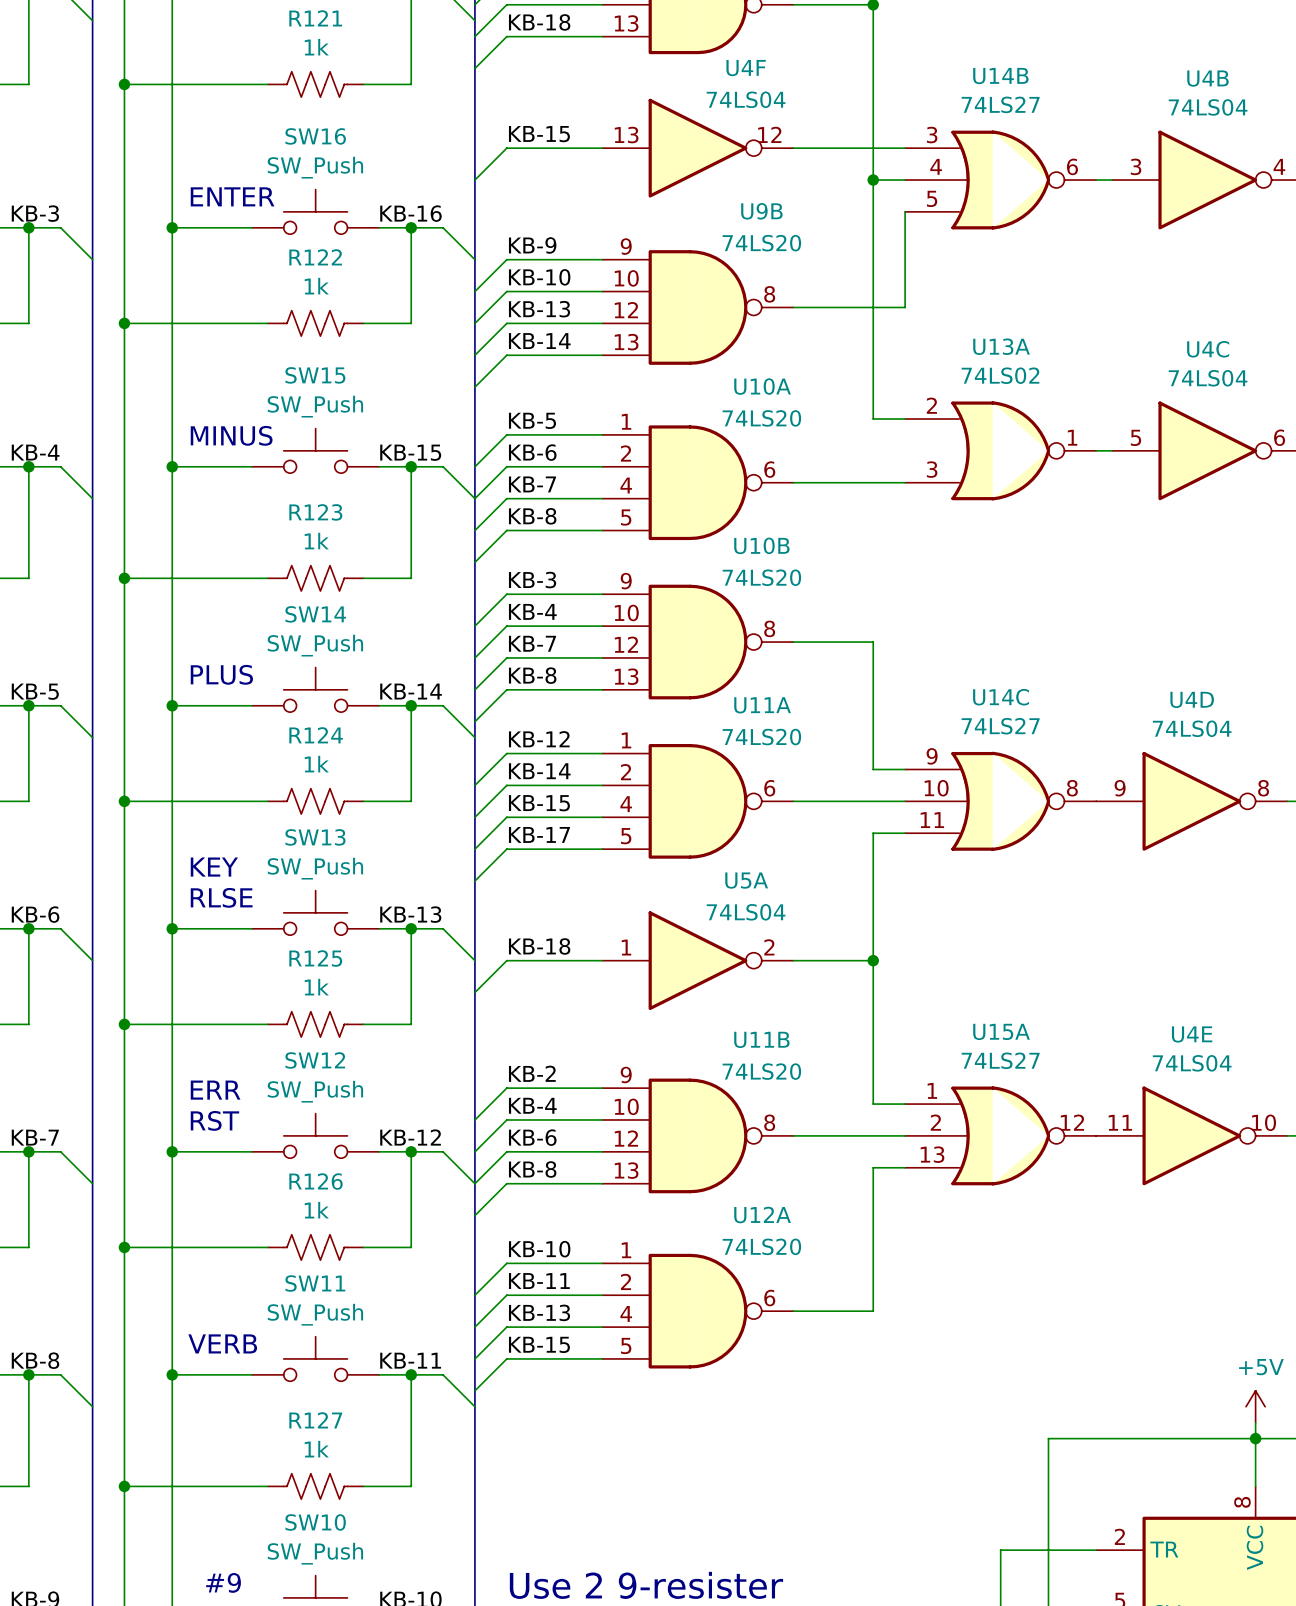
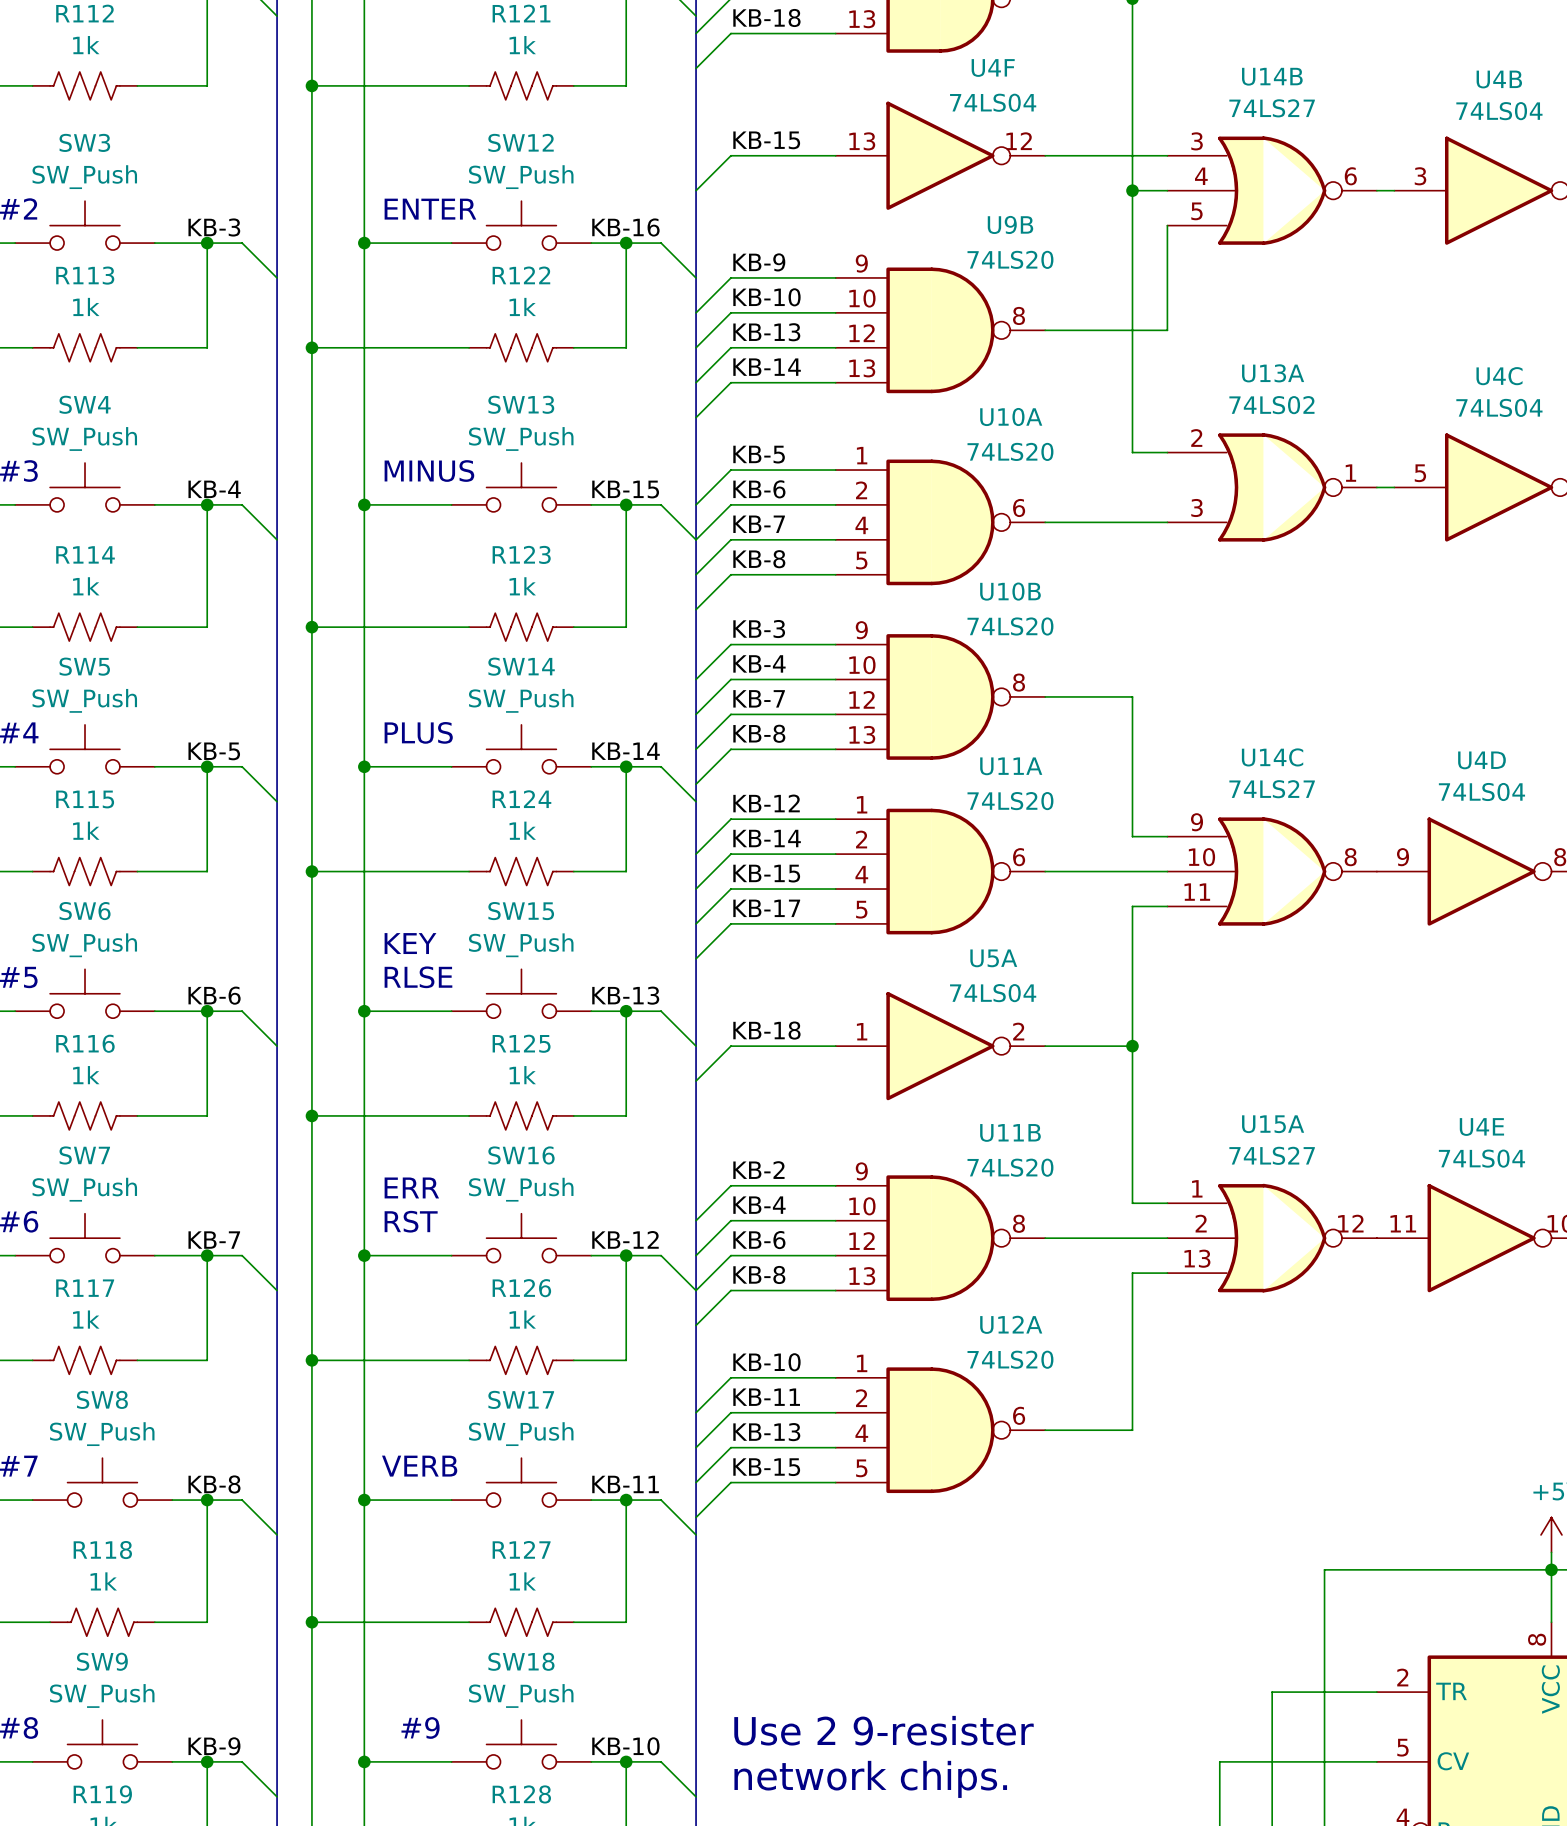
SW16 name: SW16 (315, 136) -> SW12 (521, 142)
SW15 name: SW15 (315, 375) -> SW13 (521, 404)
SW13 name: SW13 (315, 837) -> SW15 (521, 911)
SW12 name: SW12 (315, 1060) -> SW16 (521, 1155)
SW11 name: SW11 (315, 1283) -> SW17 (521, 1399)
SW10 name: SW10 (315, 1522) -> SW18 (521, 1661)

